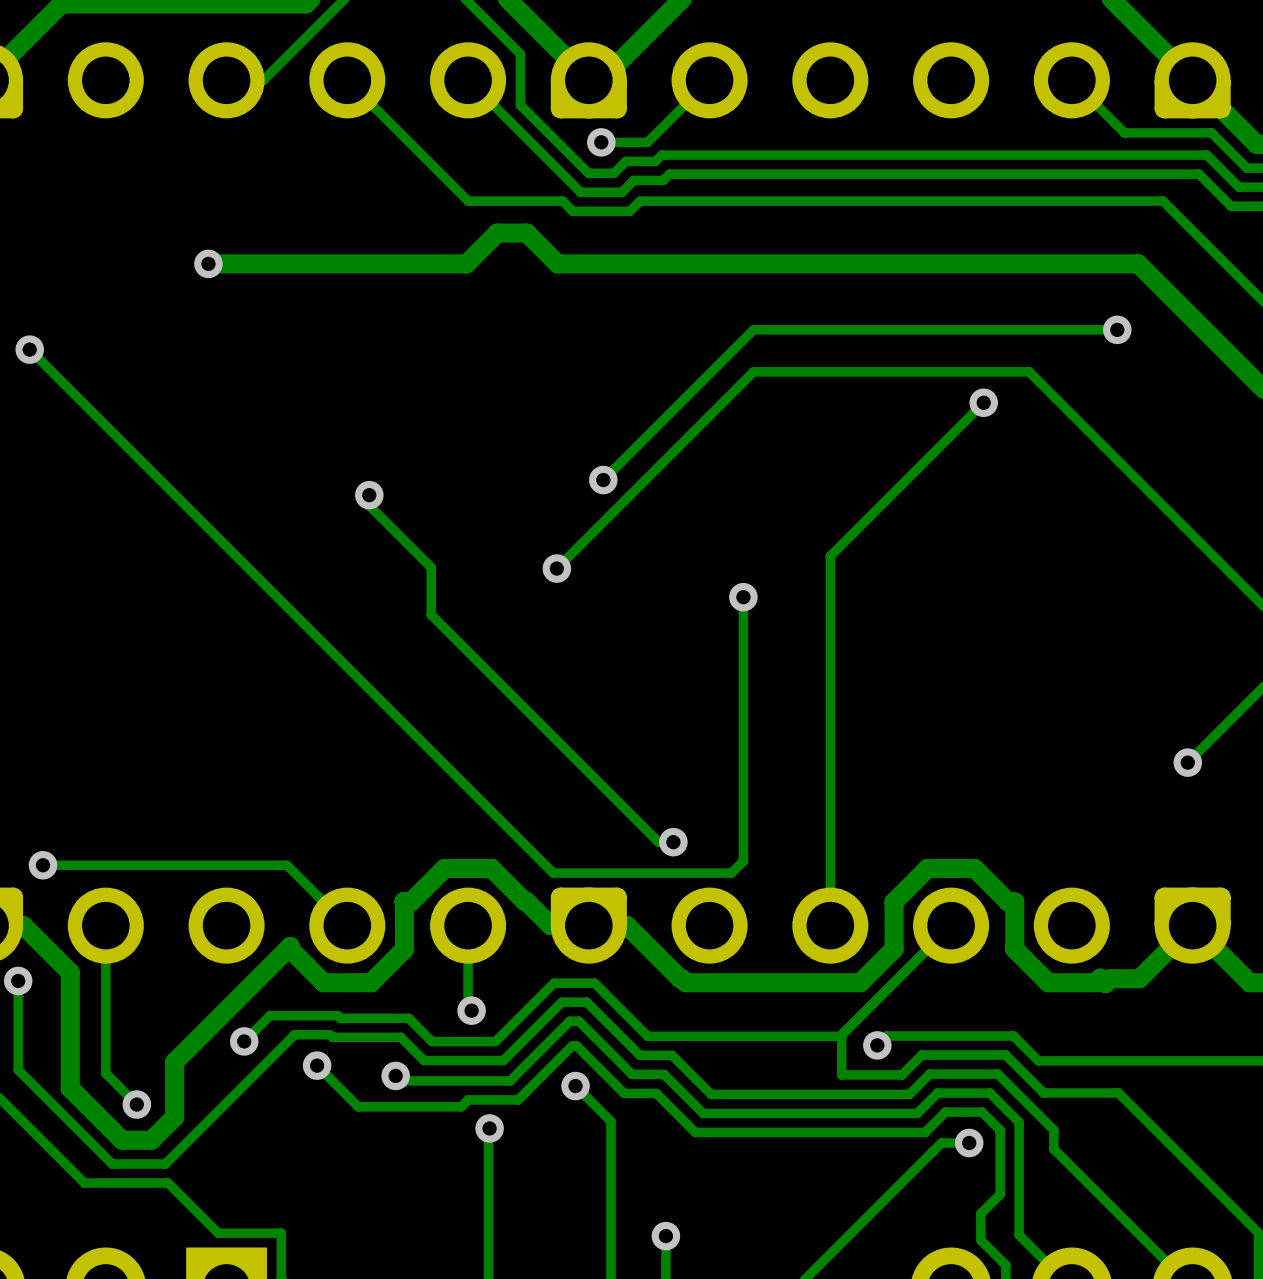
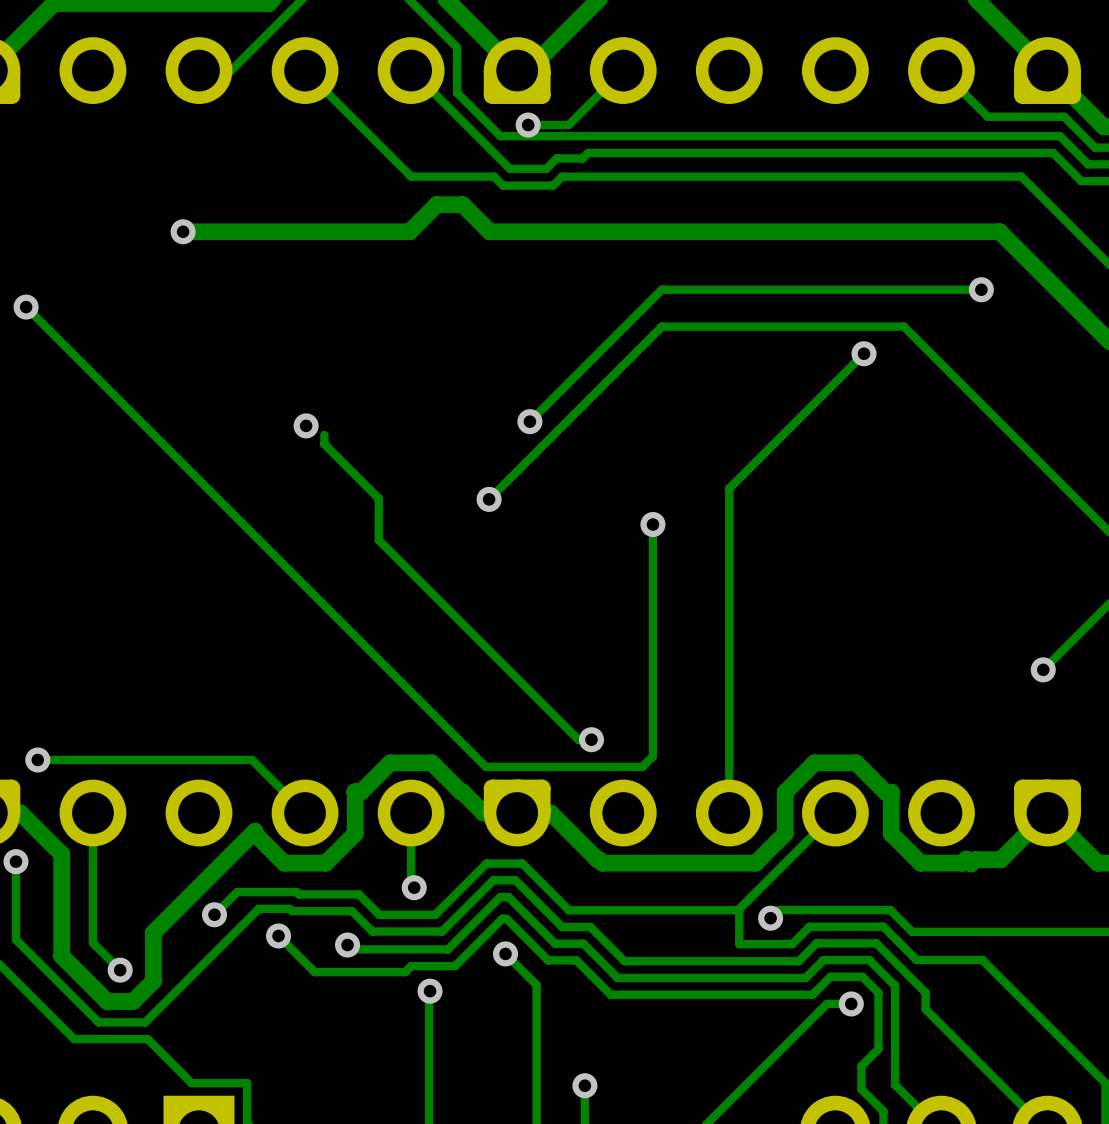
track: (520, 105) (588, 173) (613, 173) (625, 161) (655, 161) (661, 155) -> (457, 92) (500, 136) (581, 136)
via position: (369, 495) -> (306, 425)

